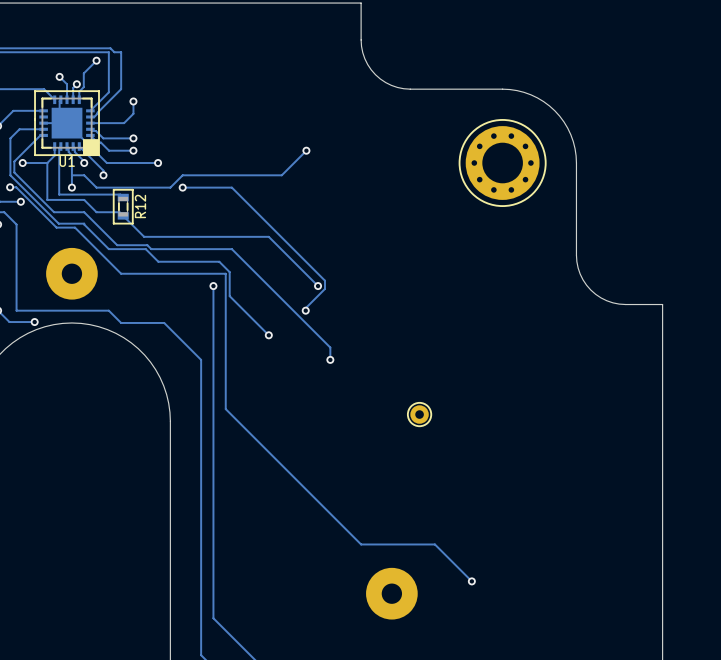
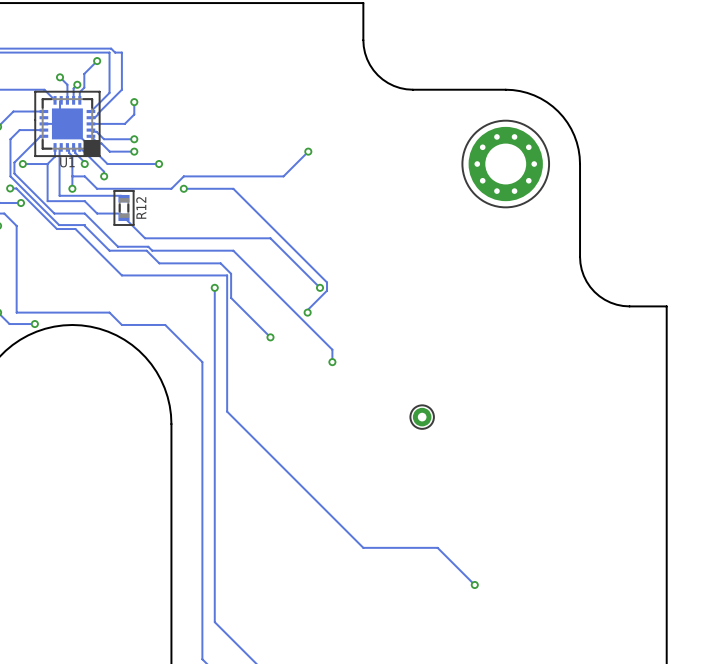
part: (71, 273) -> none
part: (391, 593) -> none

